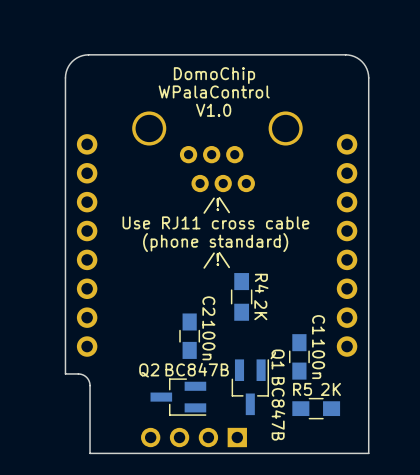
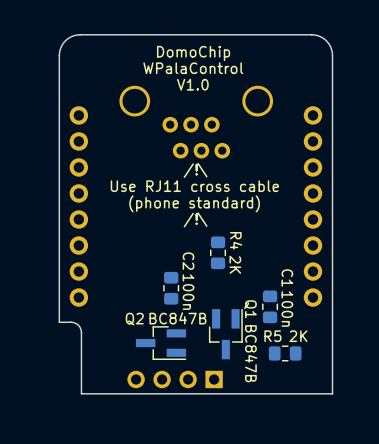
R4 footprint: [230, 273, 253, 321] -> [210, 236, 226, 270]
C2 footprint: [179, 313, 201, 359] -> [163, 271, 180, 305]
C1 footprint: [289, 334, 310, 380] -> [262, 290, 278, 324]
R5 footprint: [292, 397, 341, 420] -> [268, 345, 302, 362]

